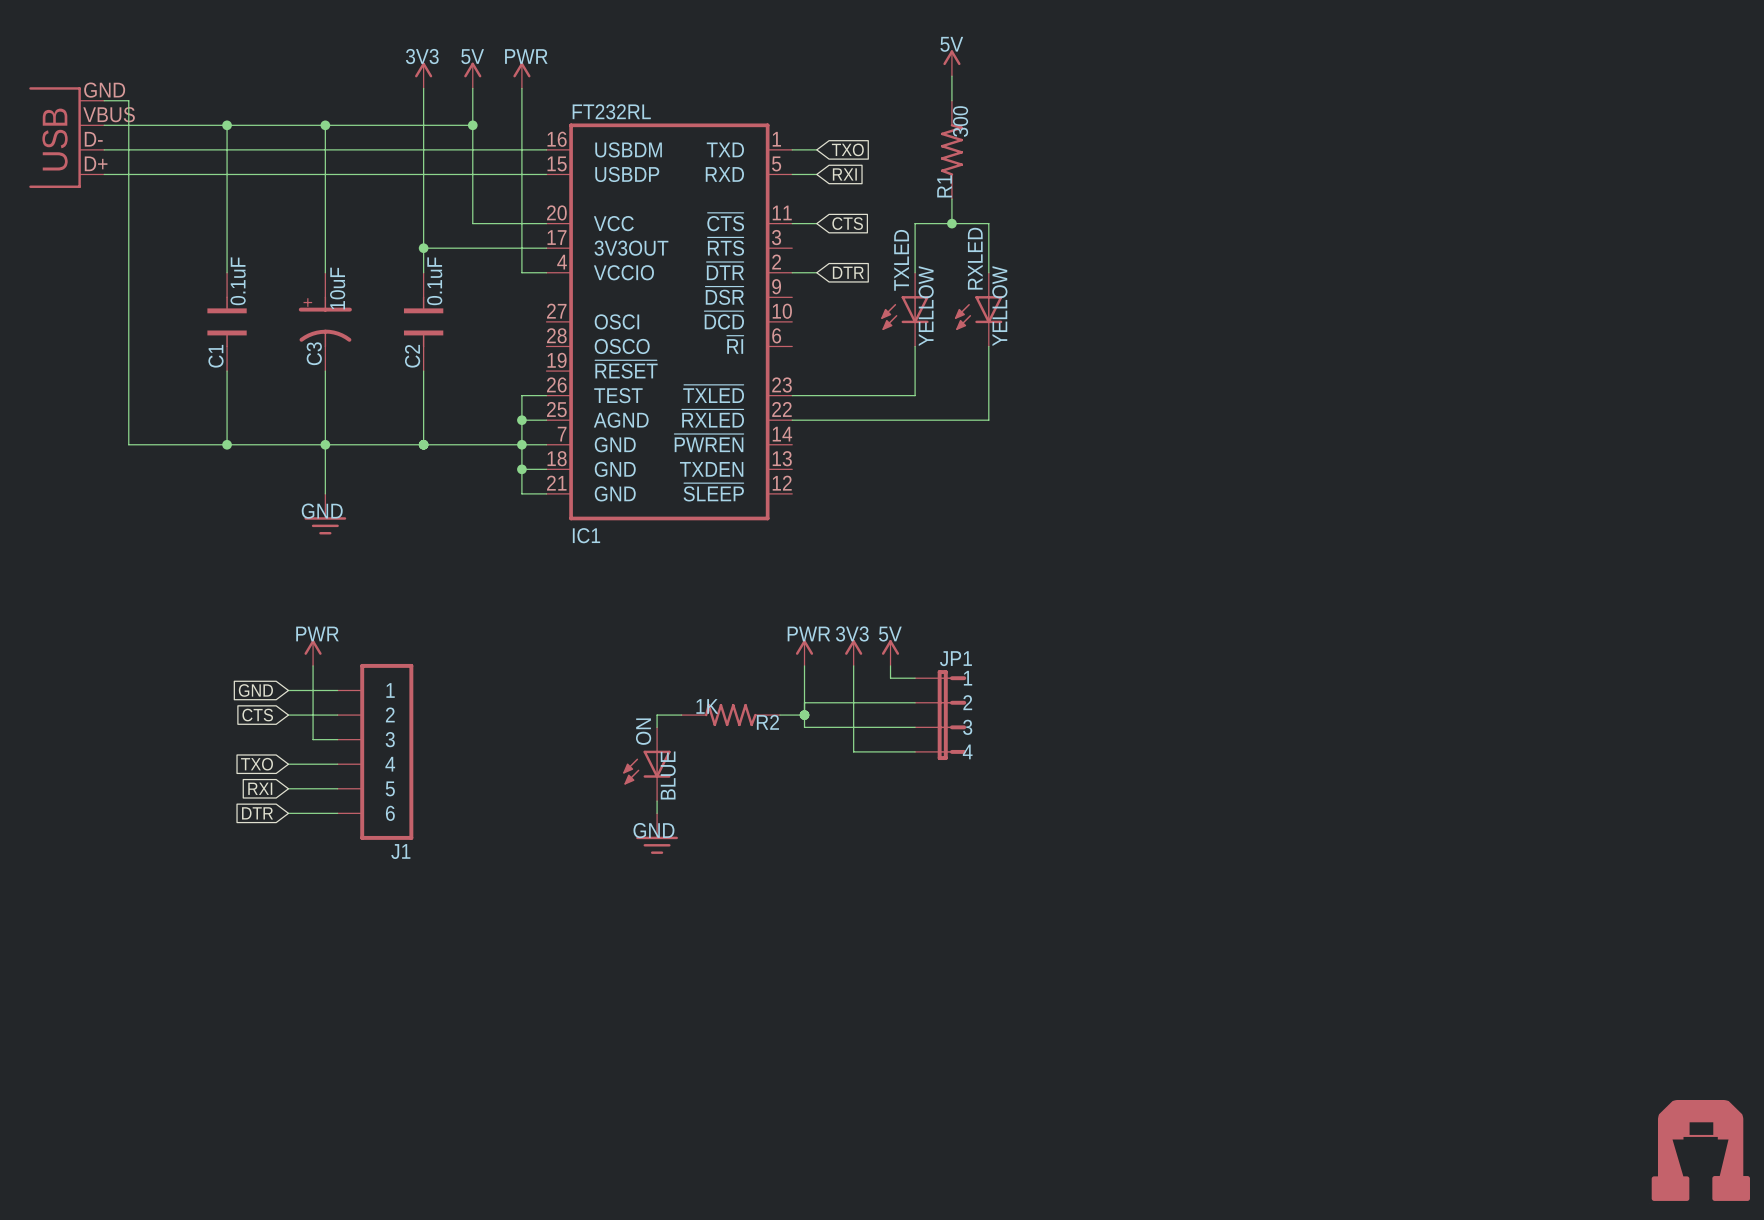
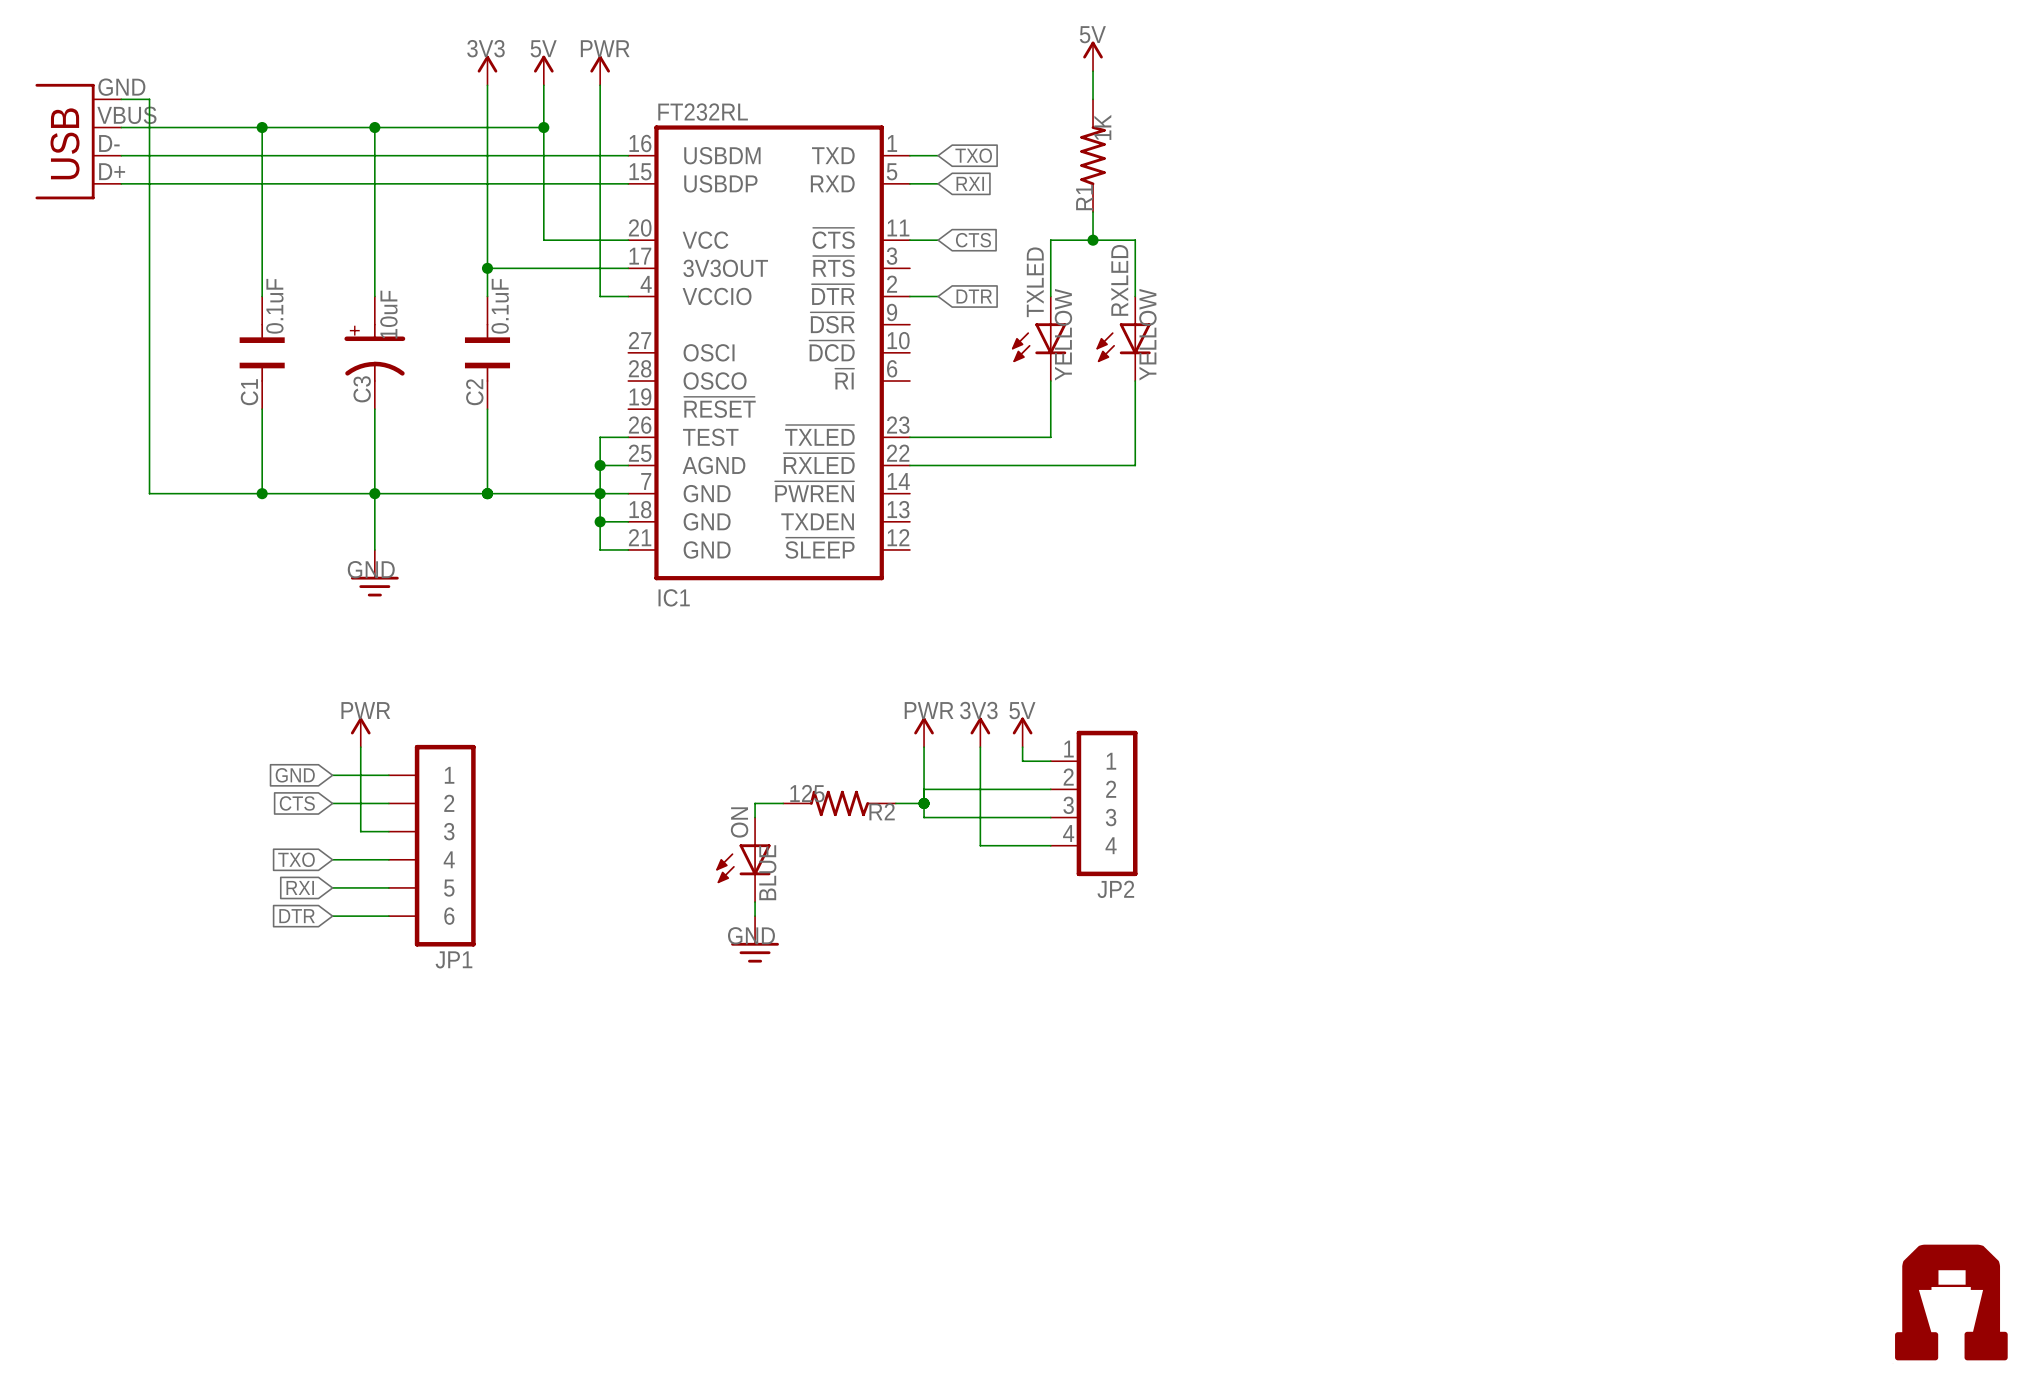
R1 value: 300 (960, 121) -> 1K (1102, 127)
R2 value: 1K (707, 706) -> 125 (807, 793)
JP1: (940, 715) -> none
JP2: none -> (1094, 803)
J1 name: J1 (400, 851) -> JP1 (453, 959)

